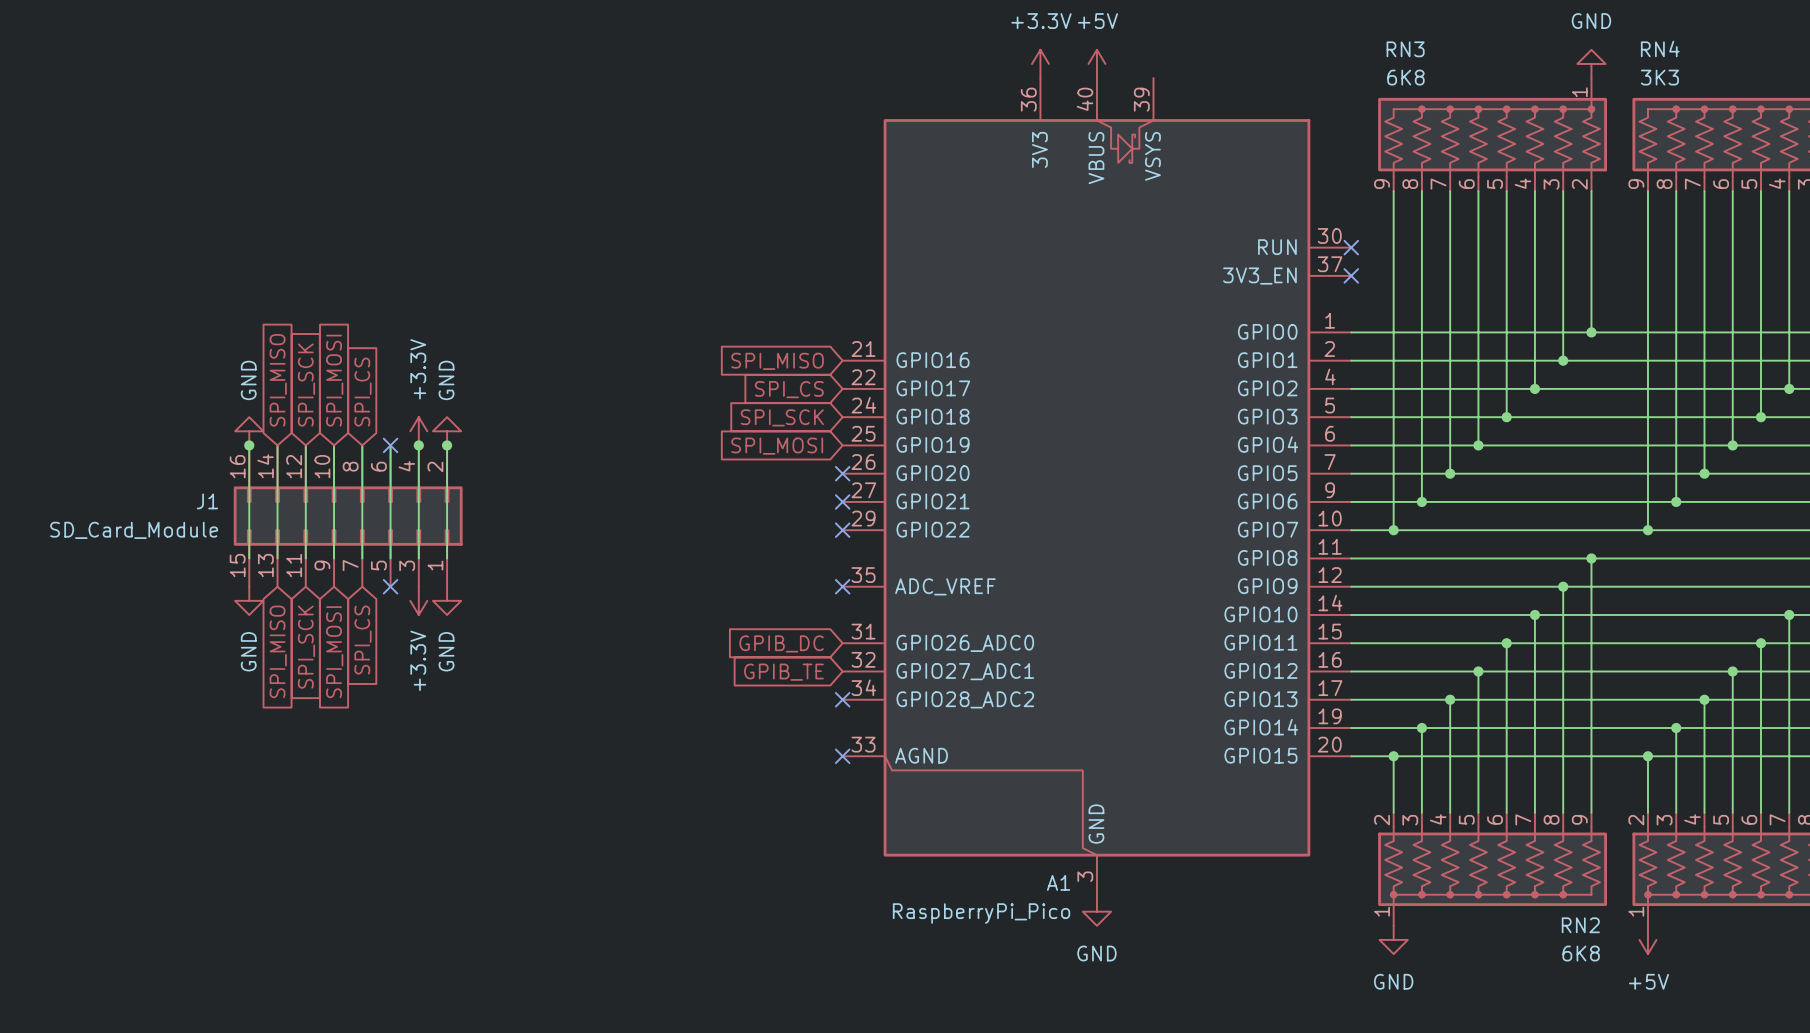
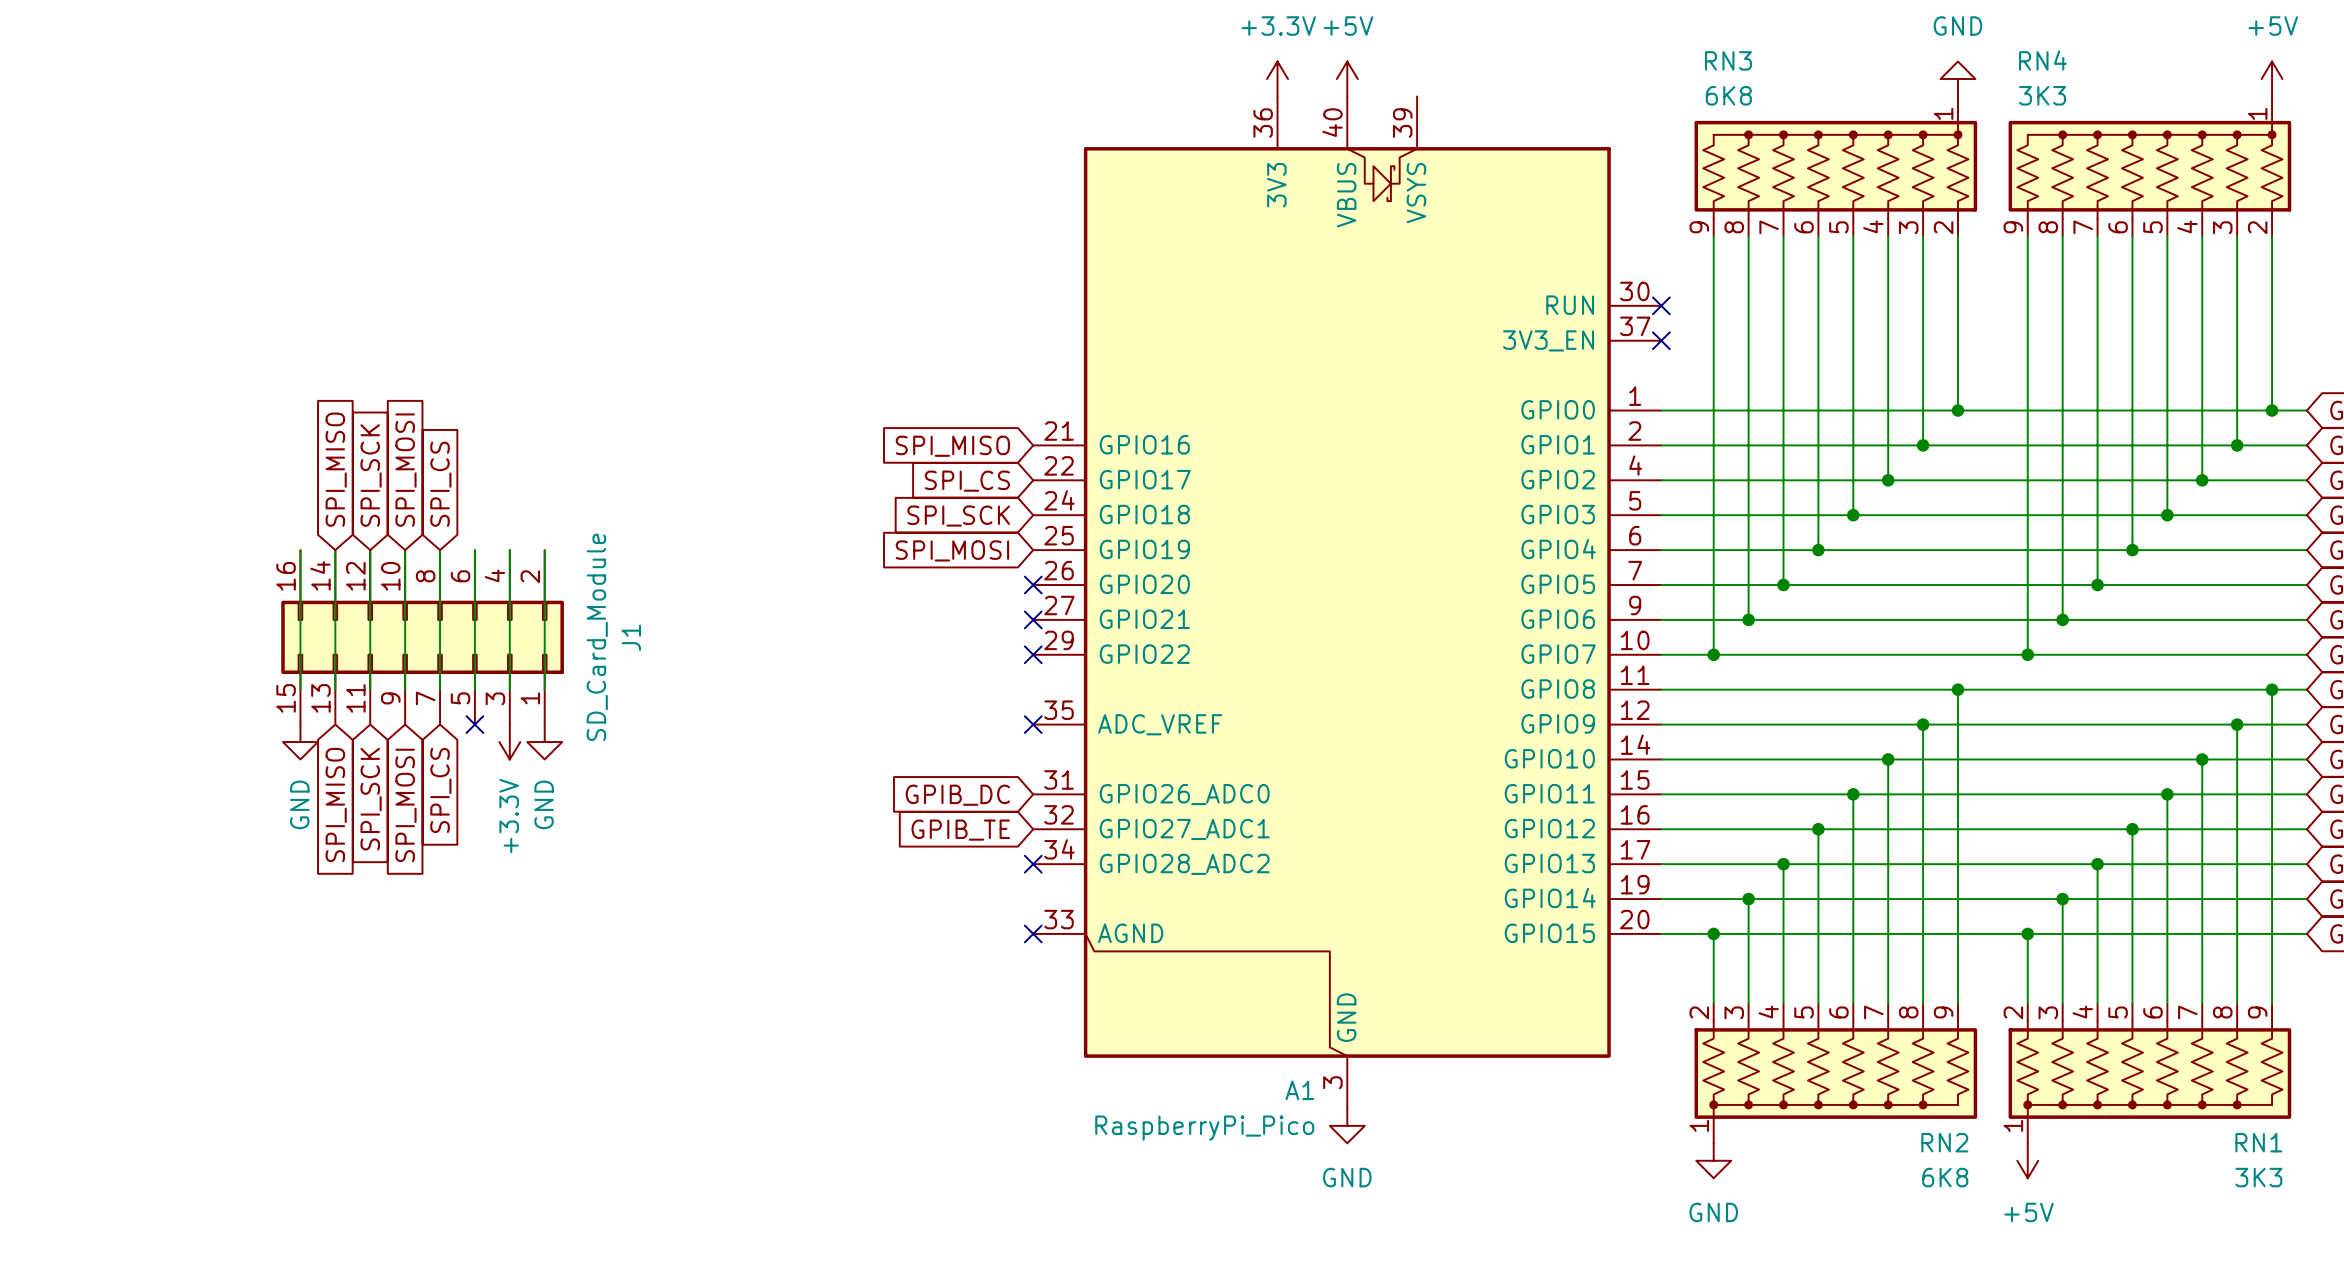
power symbol: GND (249, 431) -> none
power symbol: +3.3V (418, 431) -> none
power symbol: GND (447, 431) -> none
junction: (249, 445) -> none
no-connect mark: (390, 445) -> none
junction: (418, 445) -> none
junction: (447, 445) -> none
J1 name rotation: 0° (207, 501) -> 90° counterclockwise (631, 637)
J1 name position: J1 (207, 501) -> J1 (631, 637)
J1 value rotation: 0° (134, 530) -> 90° counterclockwise (597, 637)
J1 value position: SD_Card_Module (134, 530) -> SD_Card_Module (597, 637)

